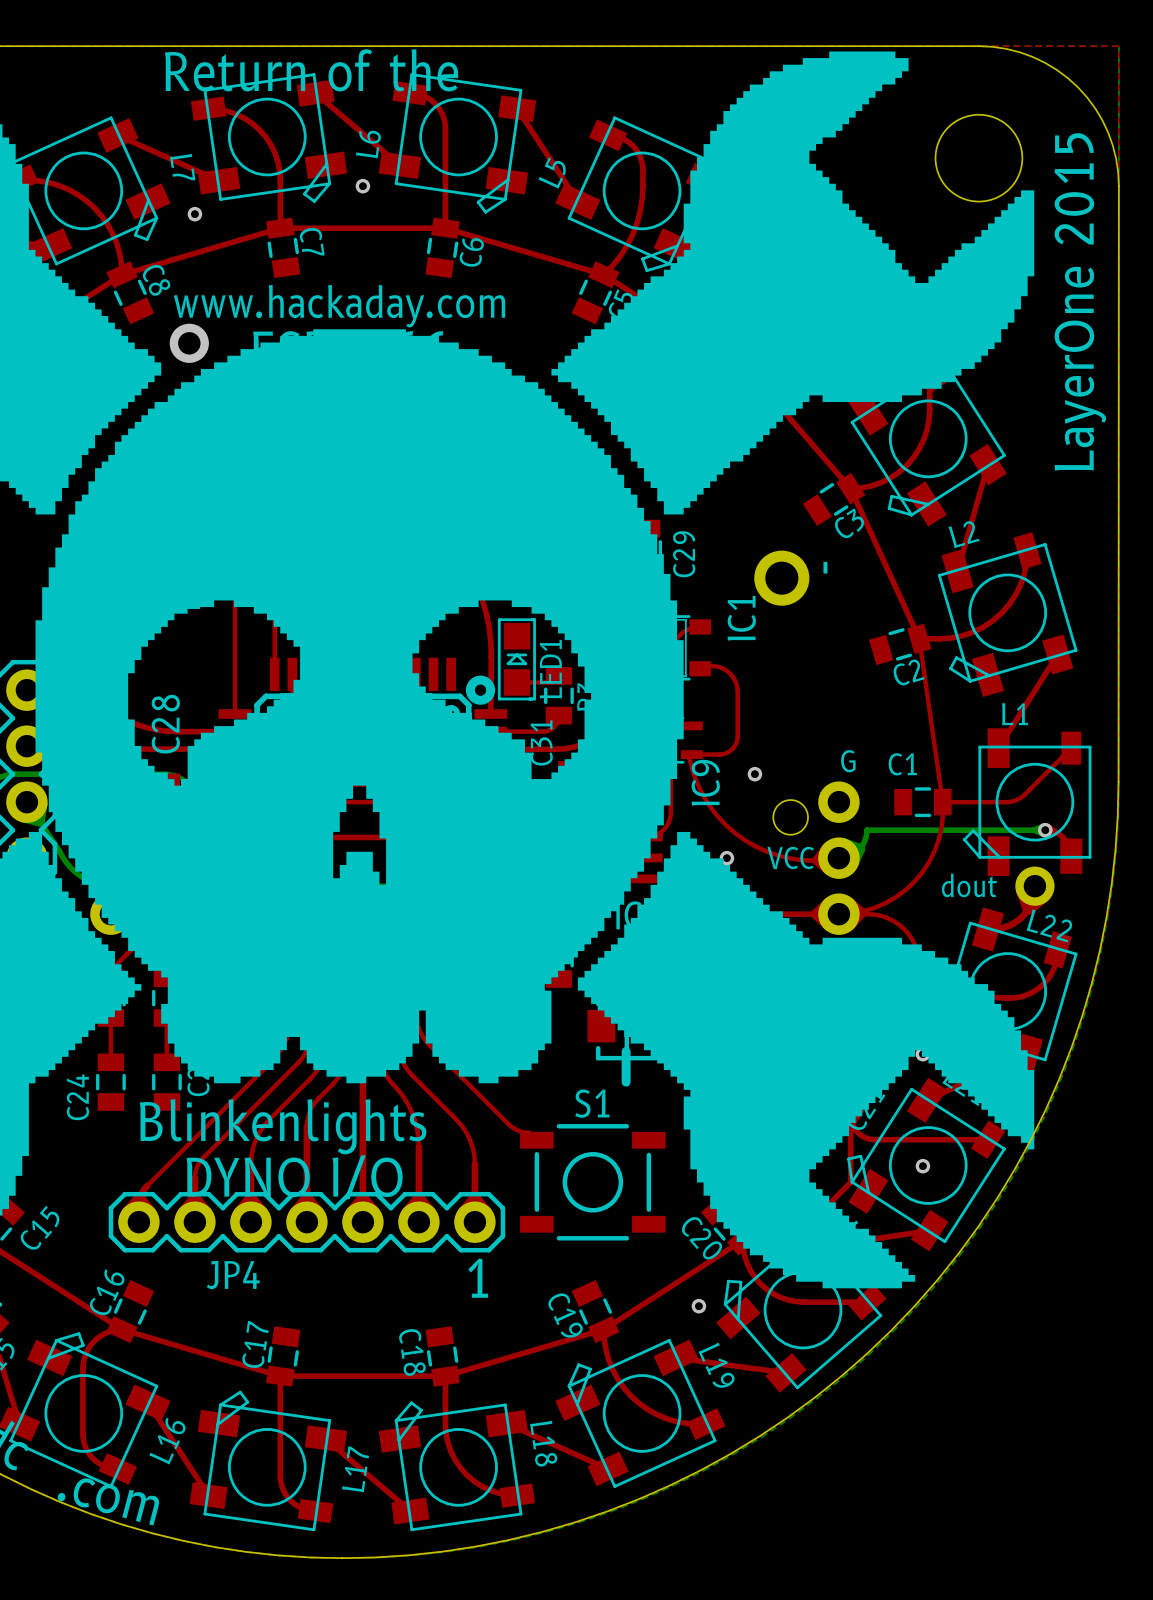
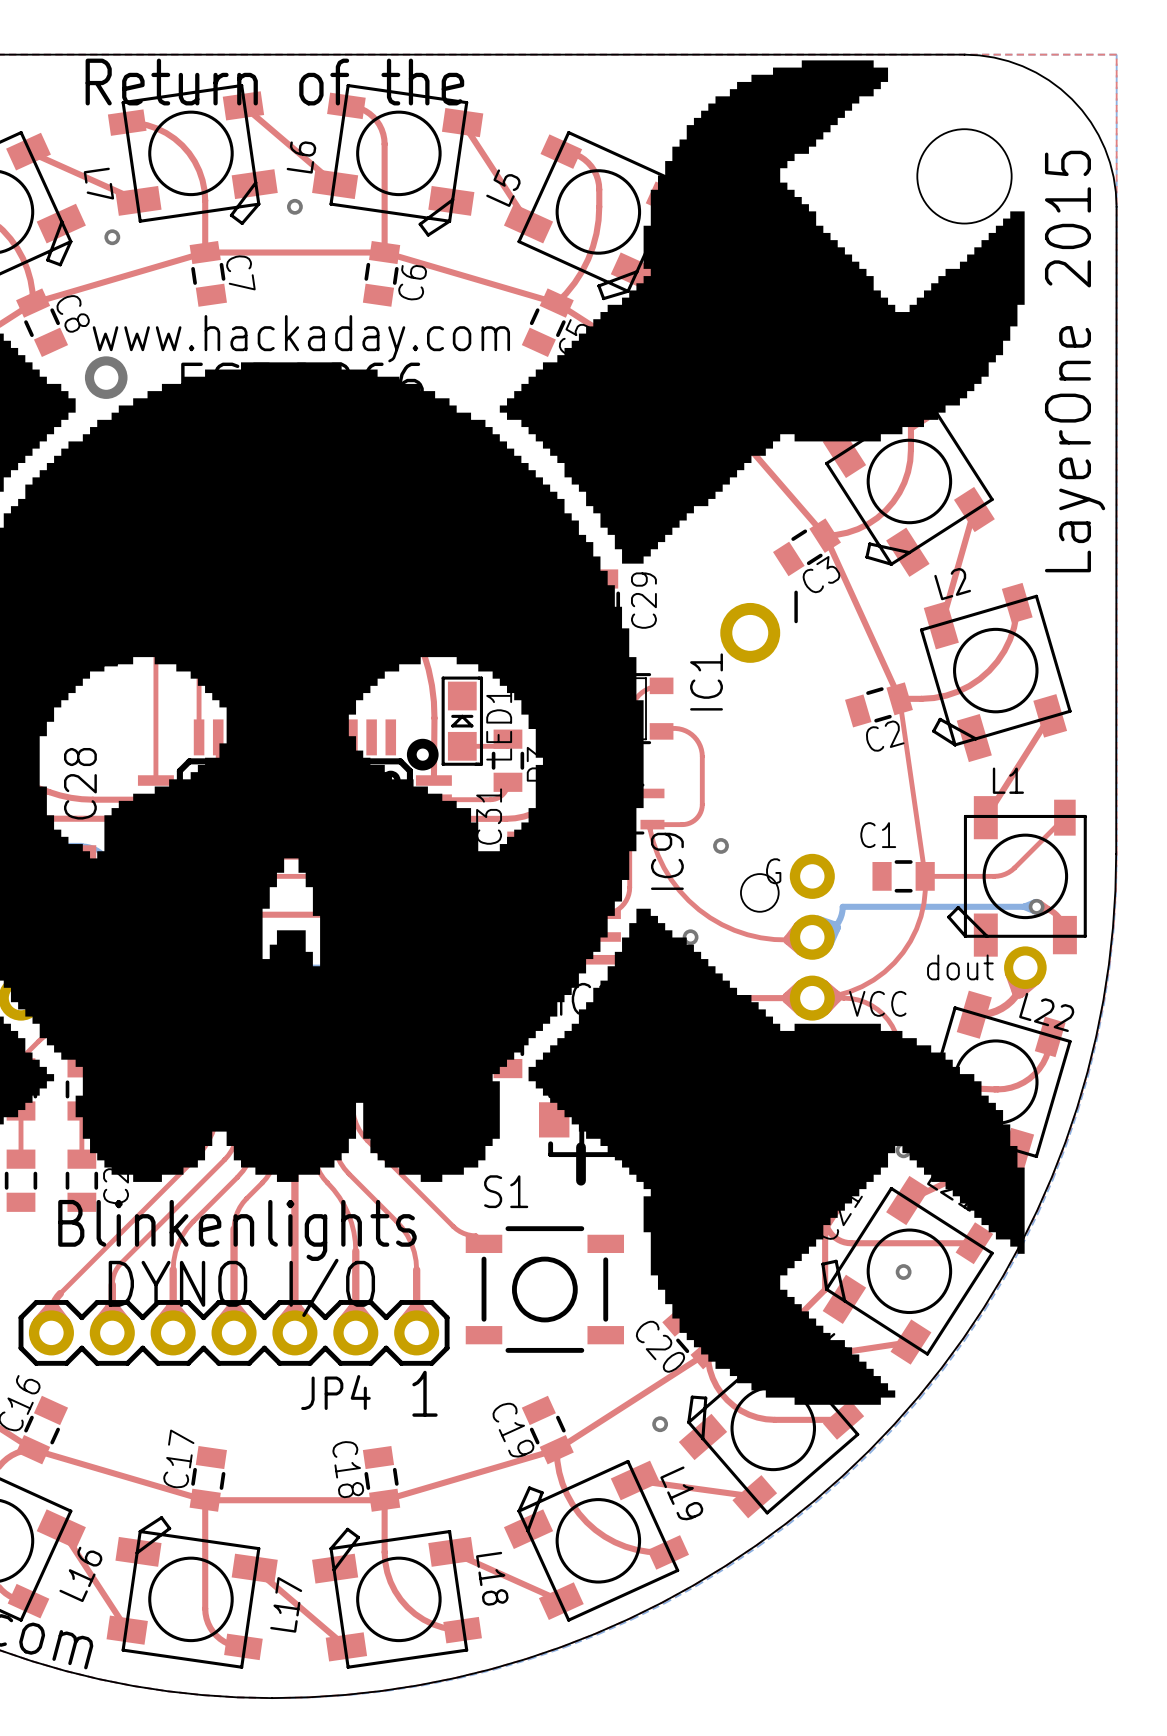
text position: G (848, 761) -> G (773, 871)
text position: VCC (790, 857) -> VCC (877, 1003)
S1 name position: S1 (592, 1103) -> S1 (506, 1191)
JP4 name position: JP4 (233, 1275) -> JP4 (335, 1392)

